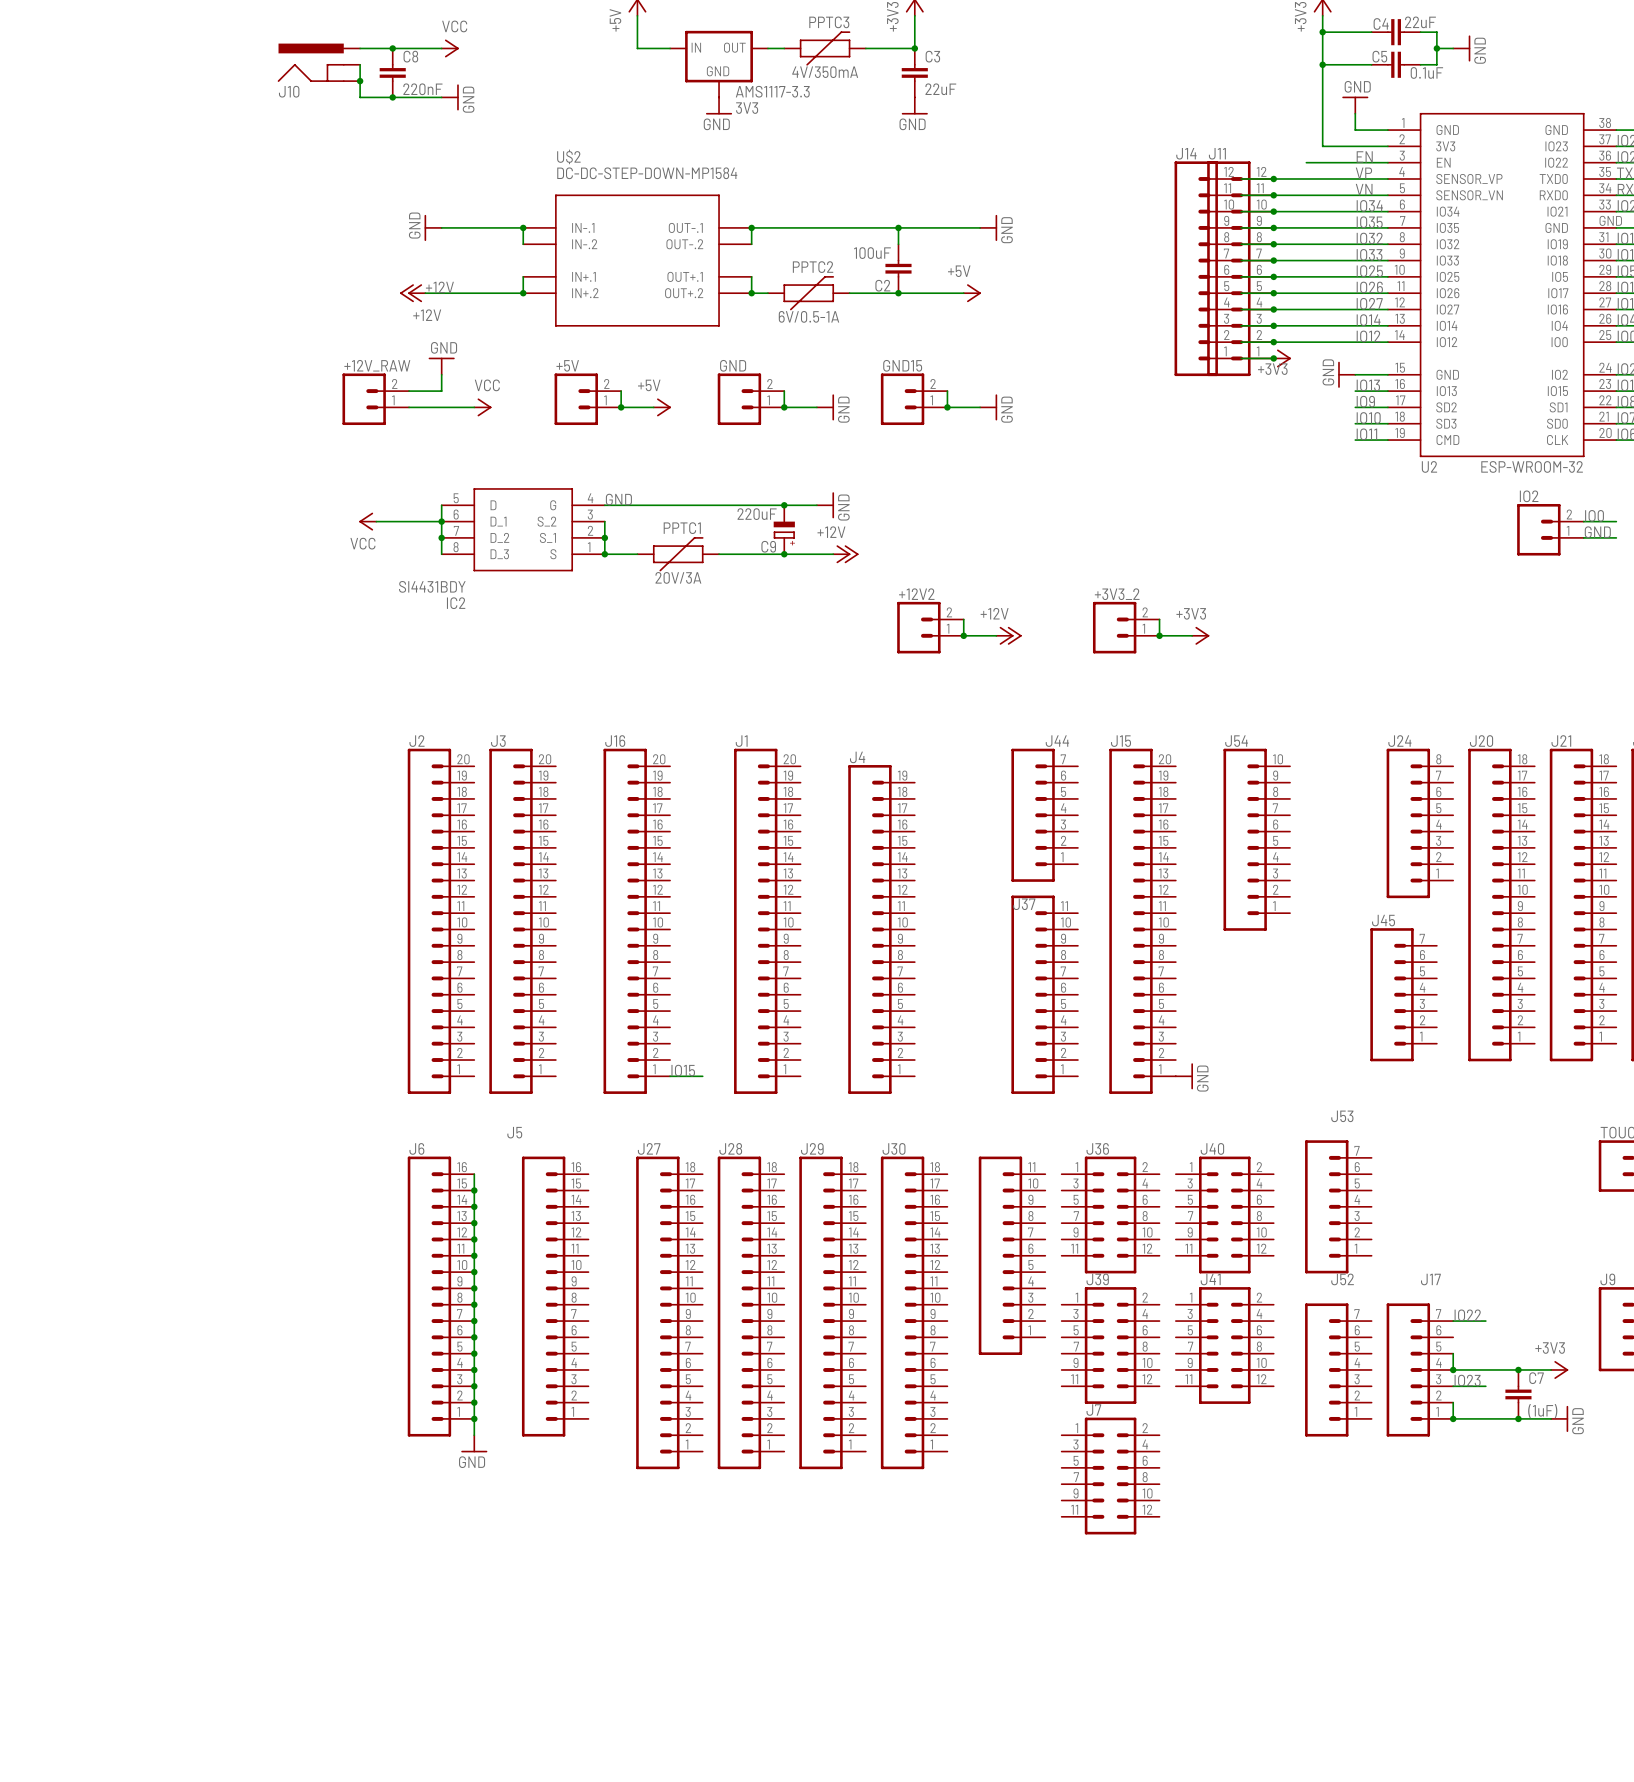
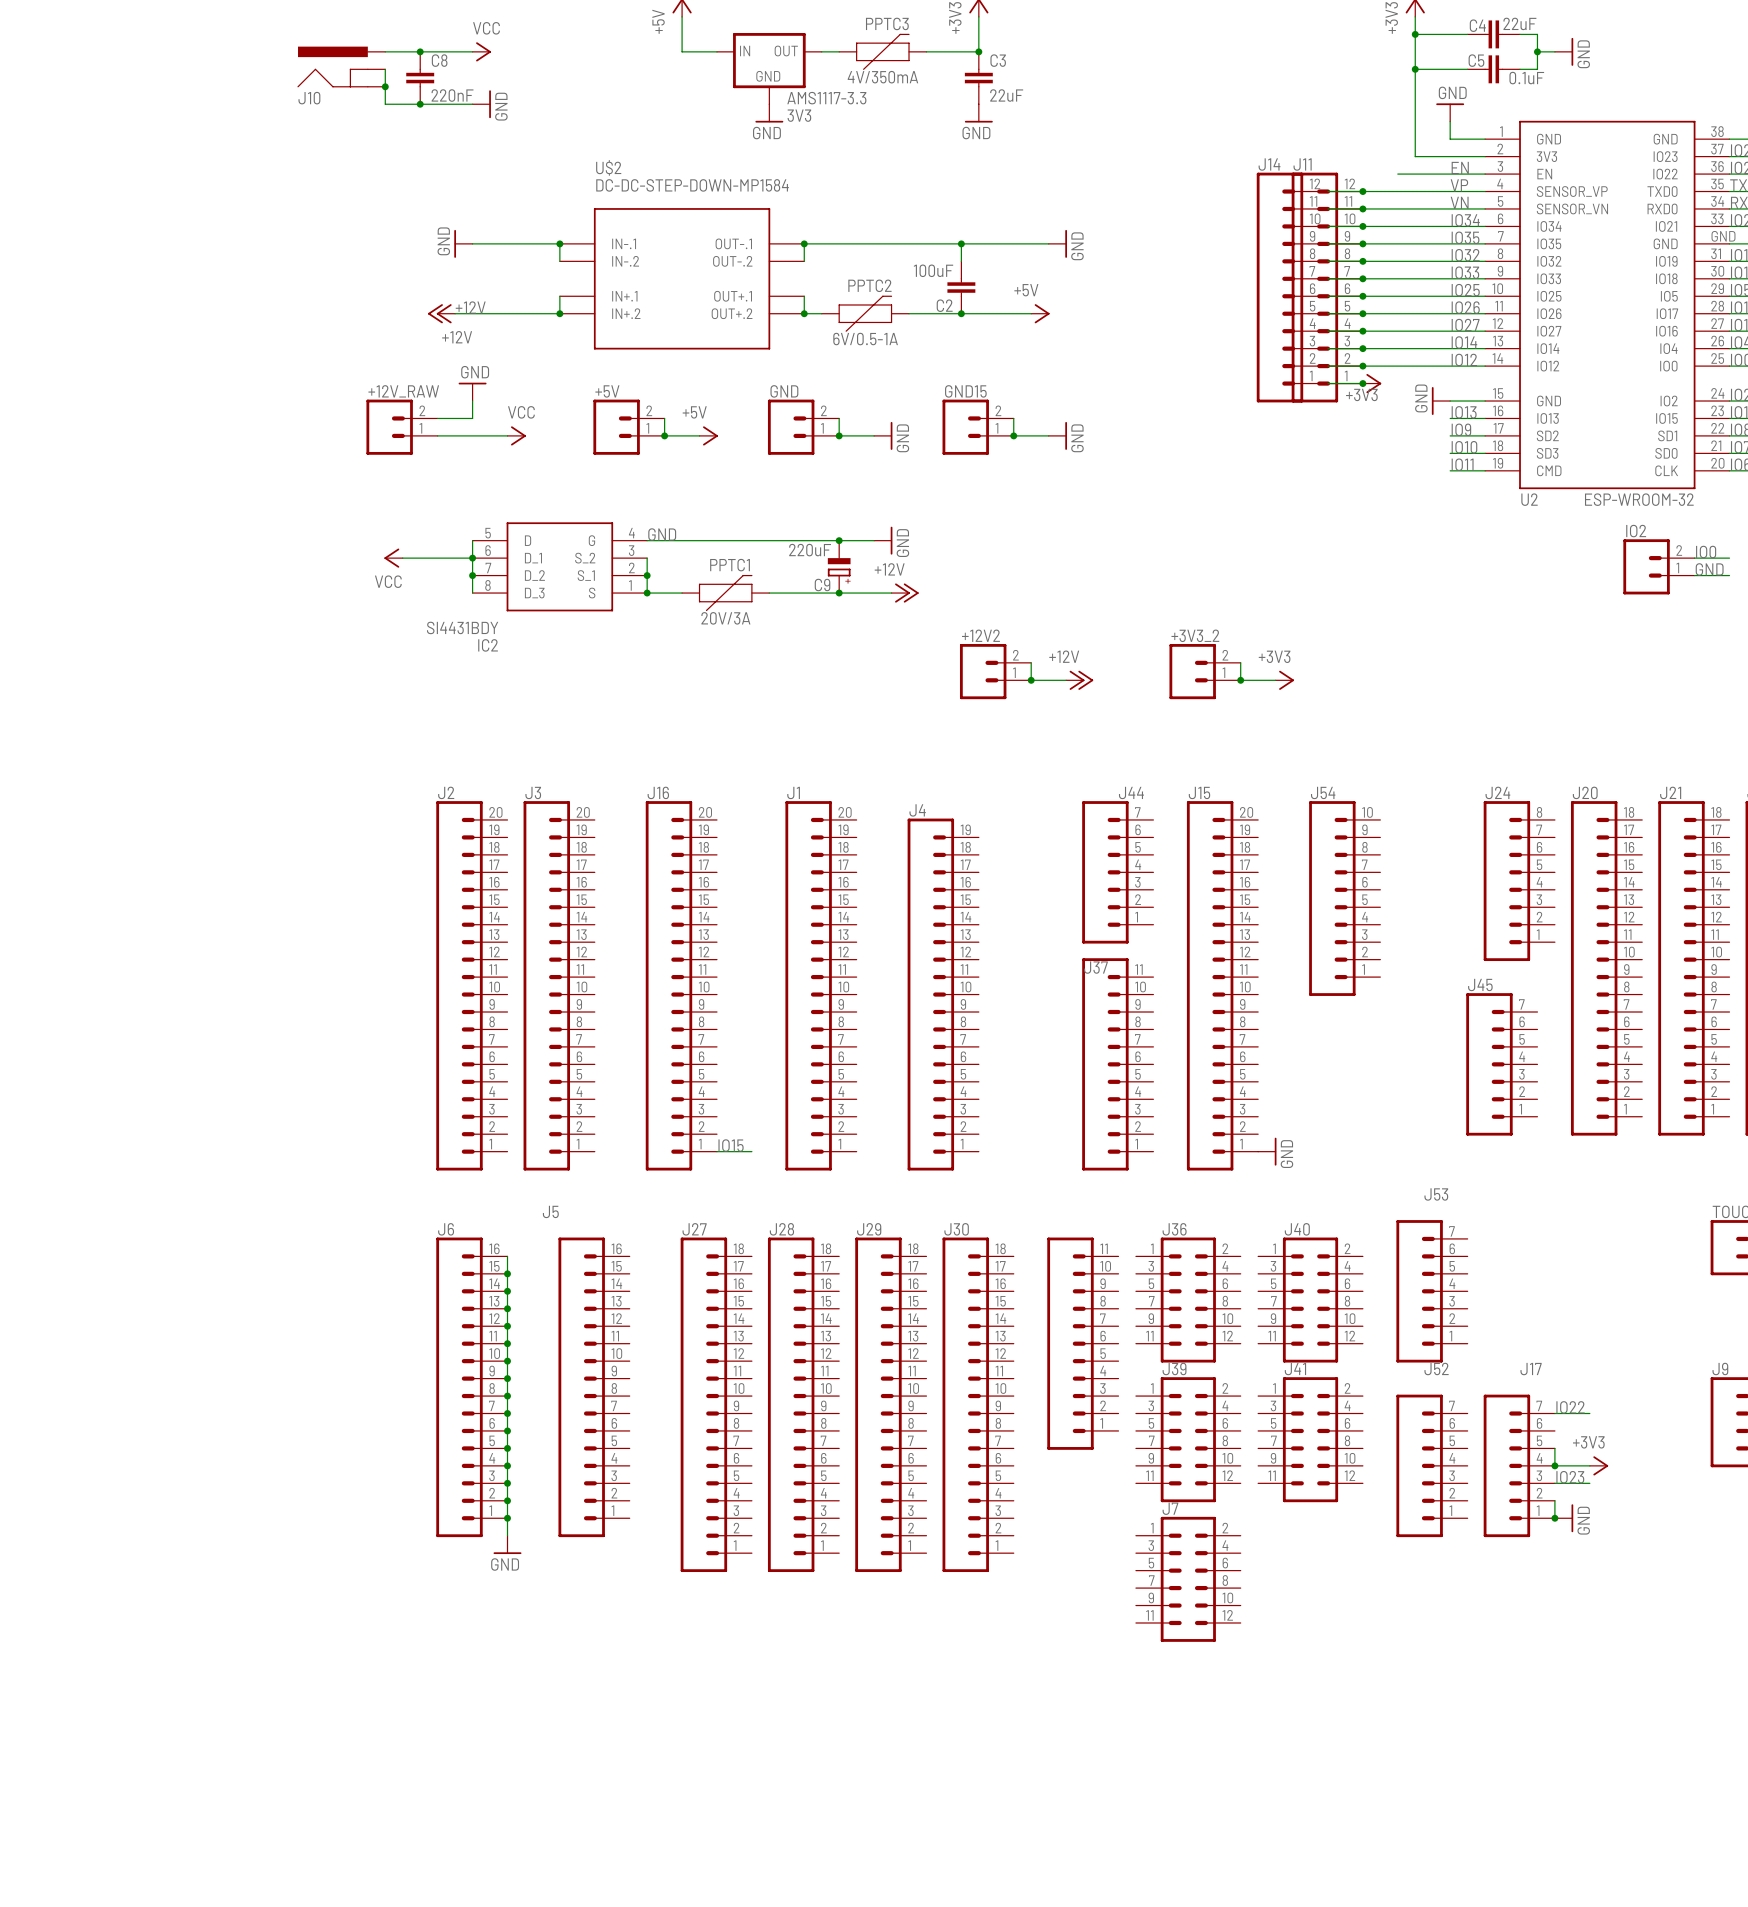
wire: (1485, 1369) (1551, 1369) -> none
junction: (1518, 1369) -> none
power symbol position: +3V3 (1559, 1369) -> +3V3 (1598, 1465)
C7: (1uF) (1518, 1394) -> none
wire: (1453, 1418) (1551, 1418) -> none
junction: (1518, 1418) -> none
power symbol position: GND (1559, 1418) -> GND (1564, 1518)

